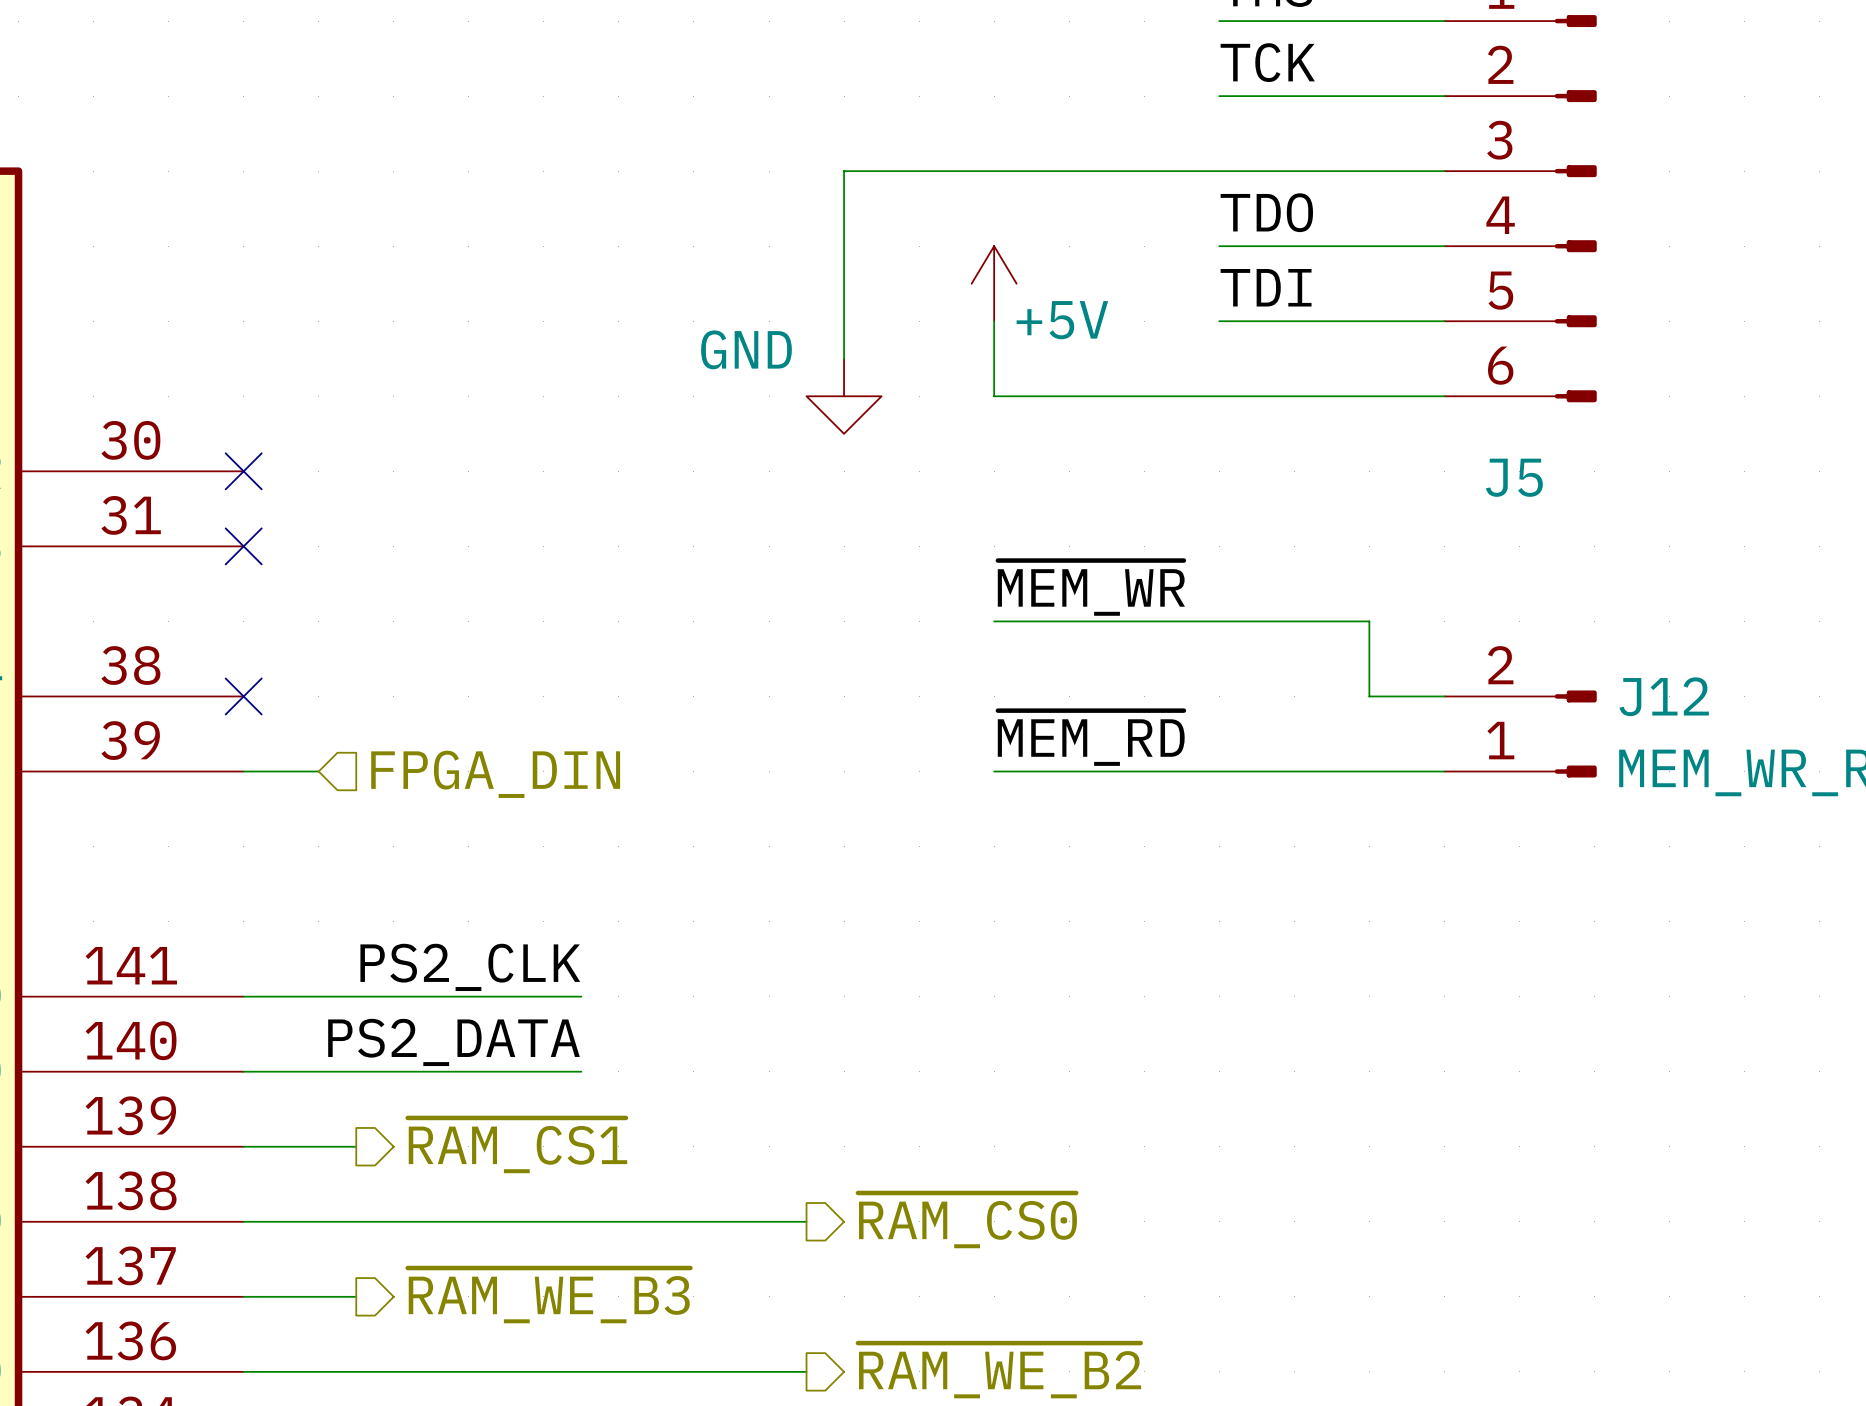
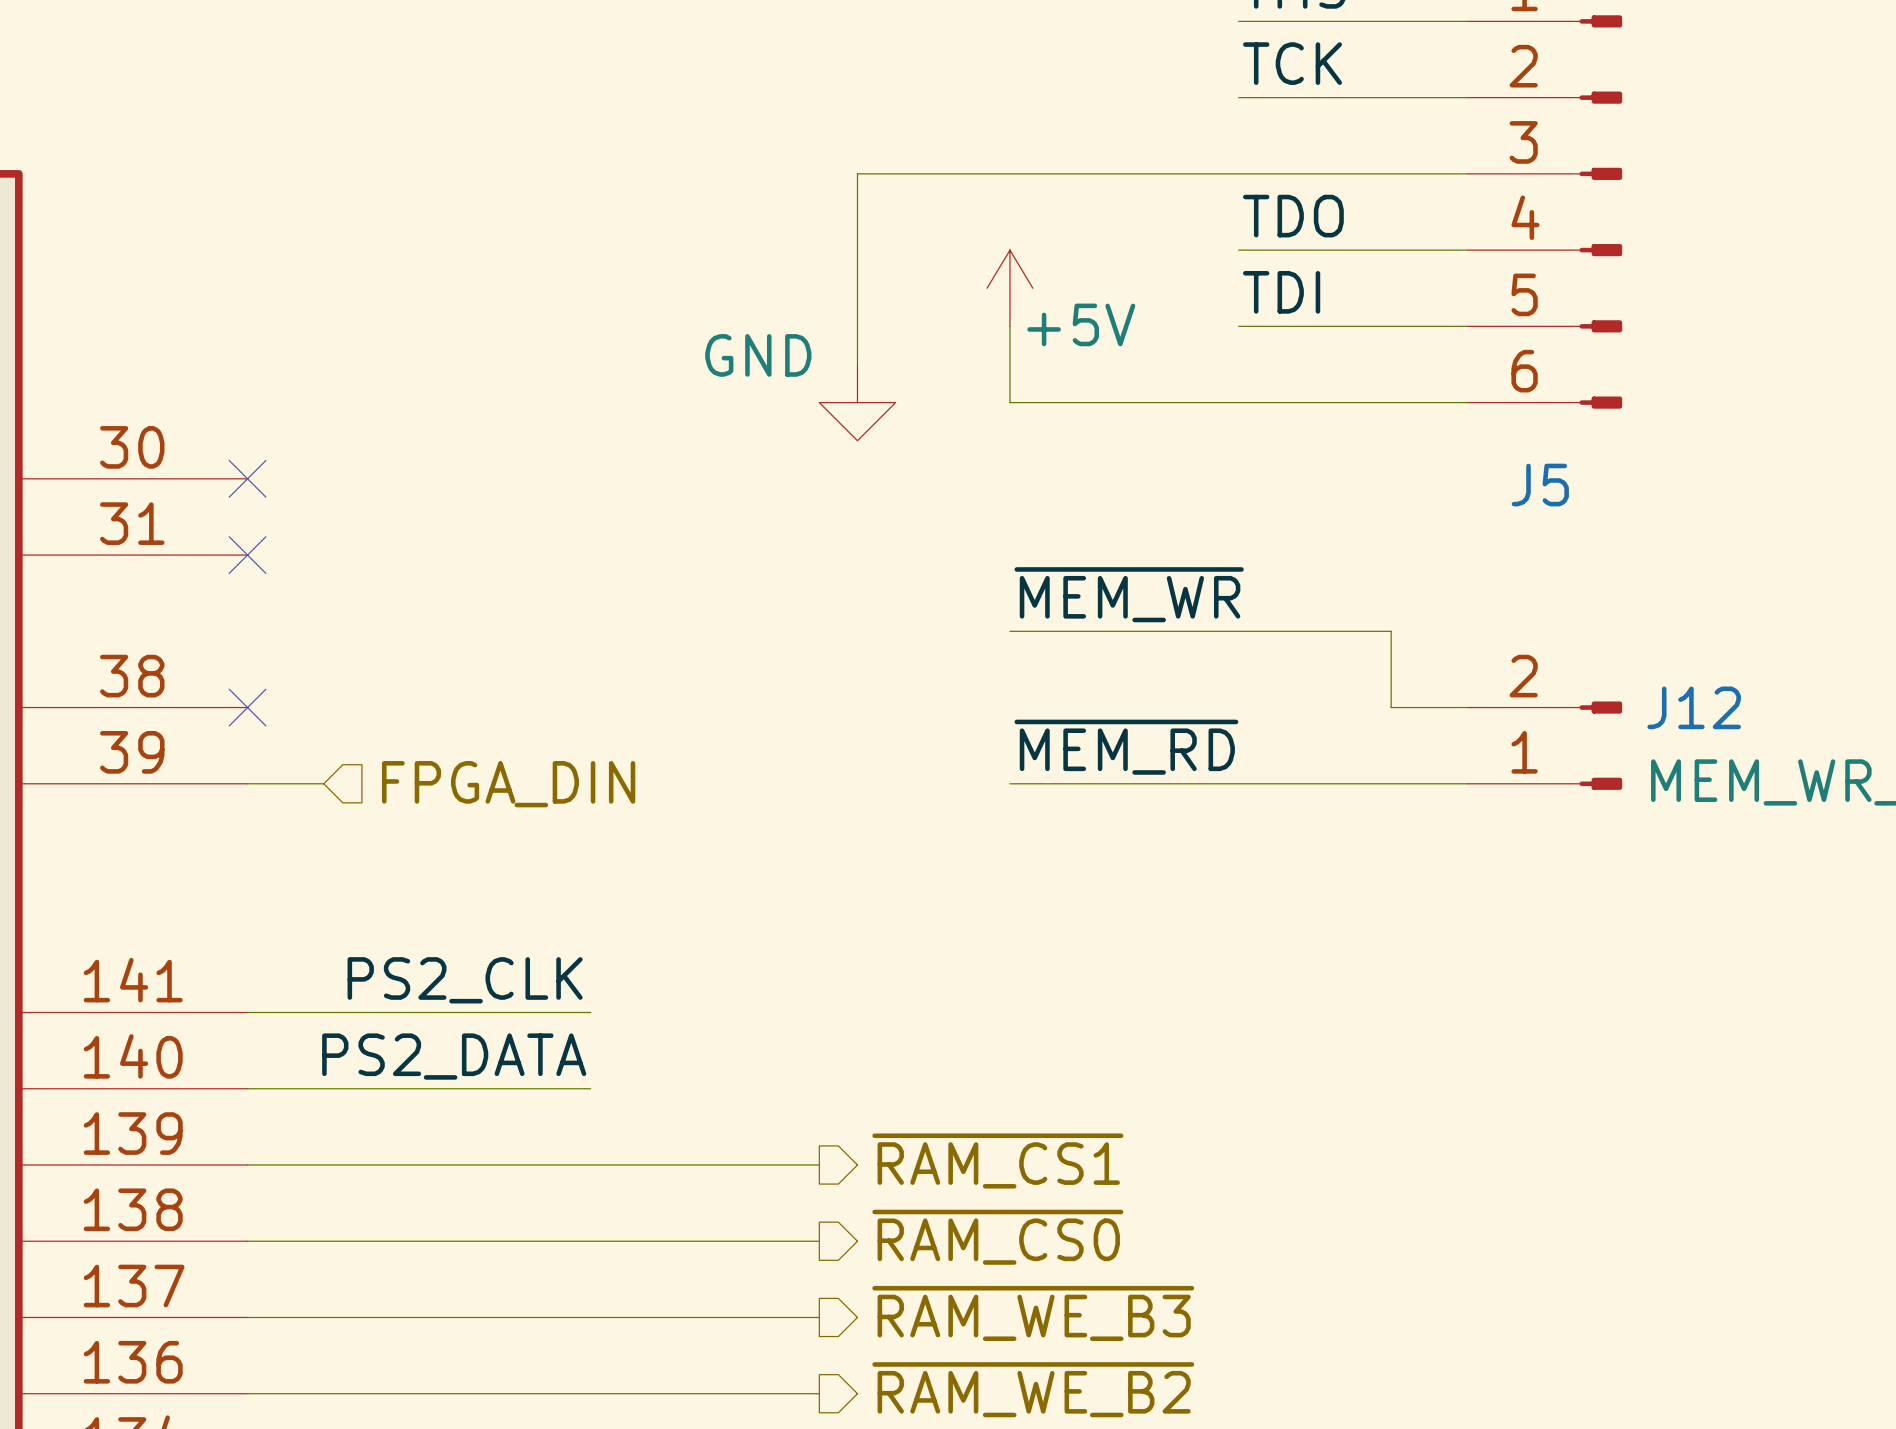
hierarchical label position: ~{RAM_CS1} (517, 1145) -> ~{RAM_CS1} (997, 1161)
wire: none -> (361, 1164) (819, 1164)
hierarchical label position: ~{RAM_WE_B3} (549, 1295) -> ~{RAM_WE_B3} (1033, 1313)
wire: none -> (361, 1317) (819, 1317)

